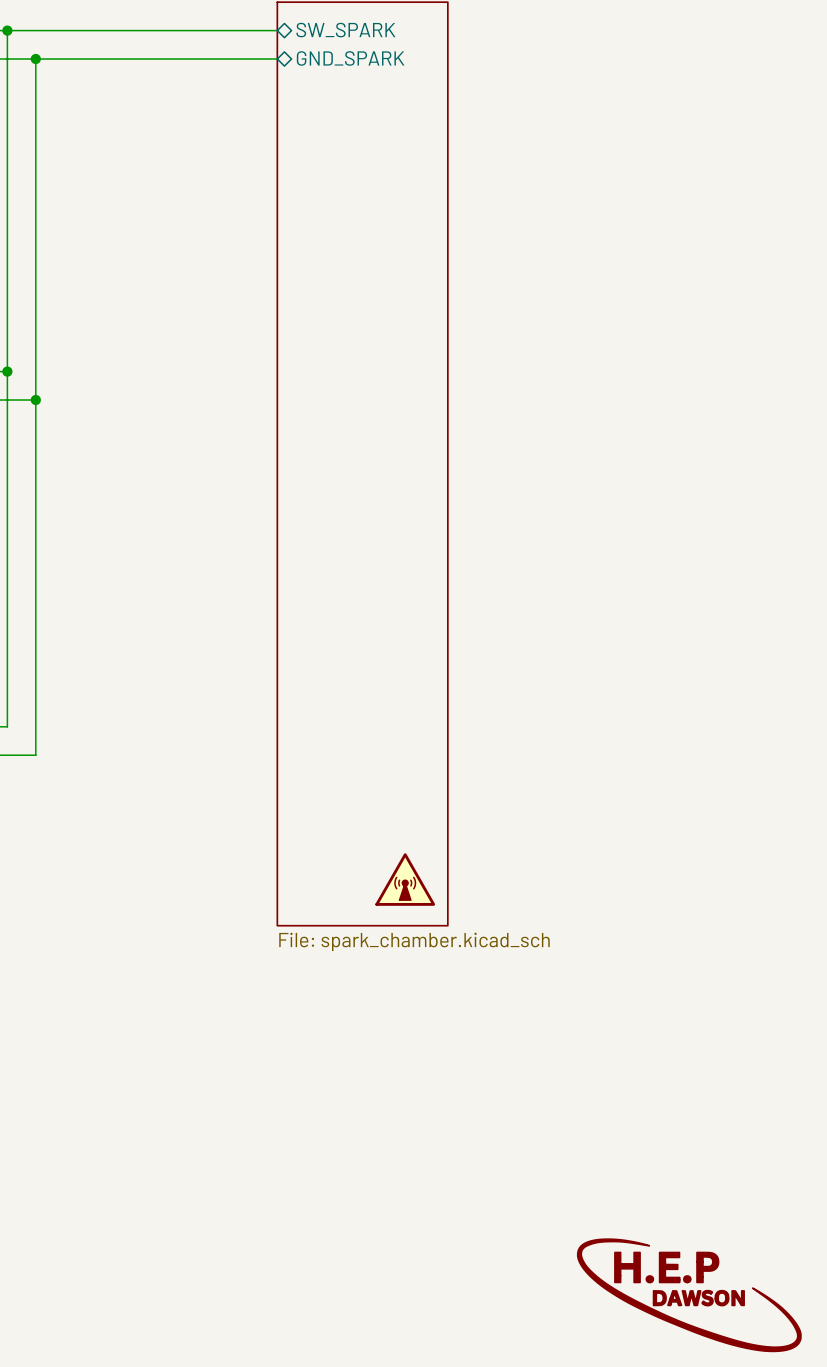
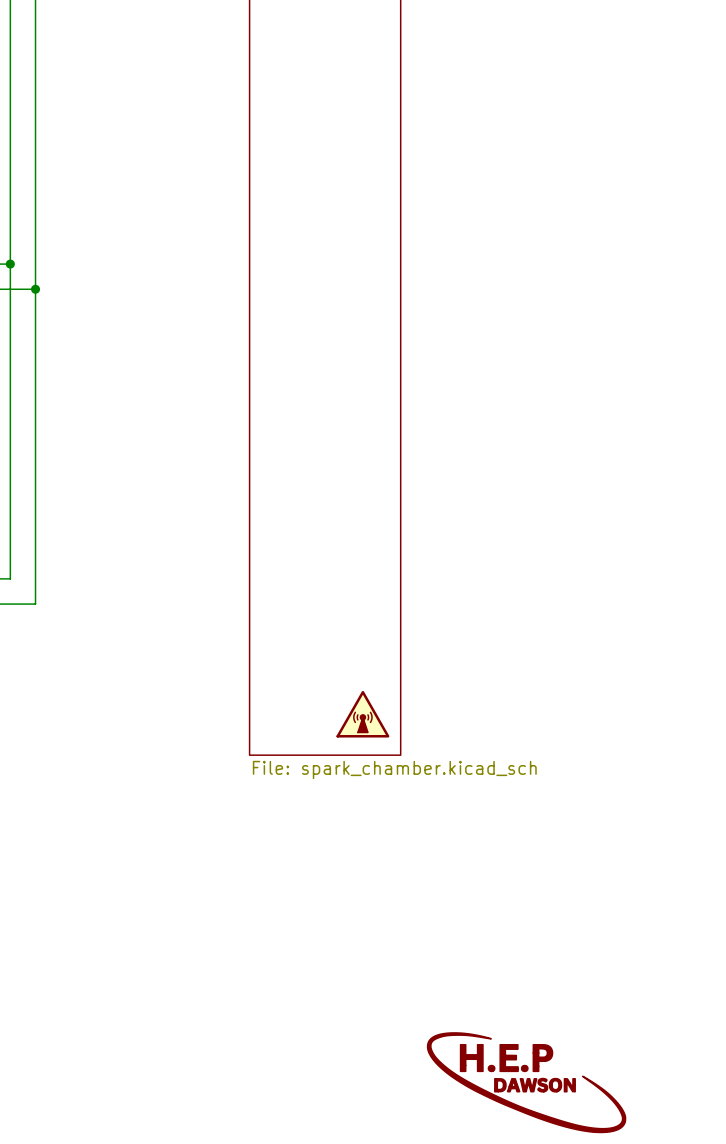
power symbol position: (689, 1295) -> (526, 1082)

